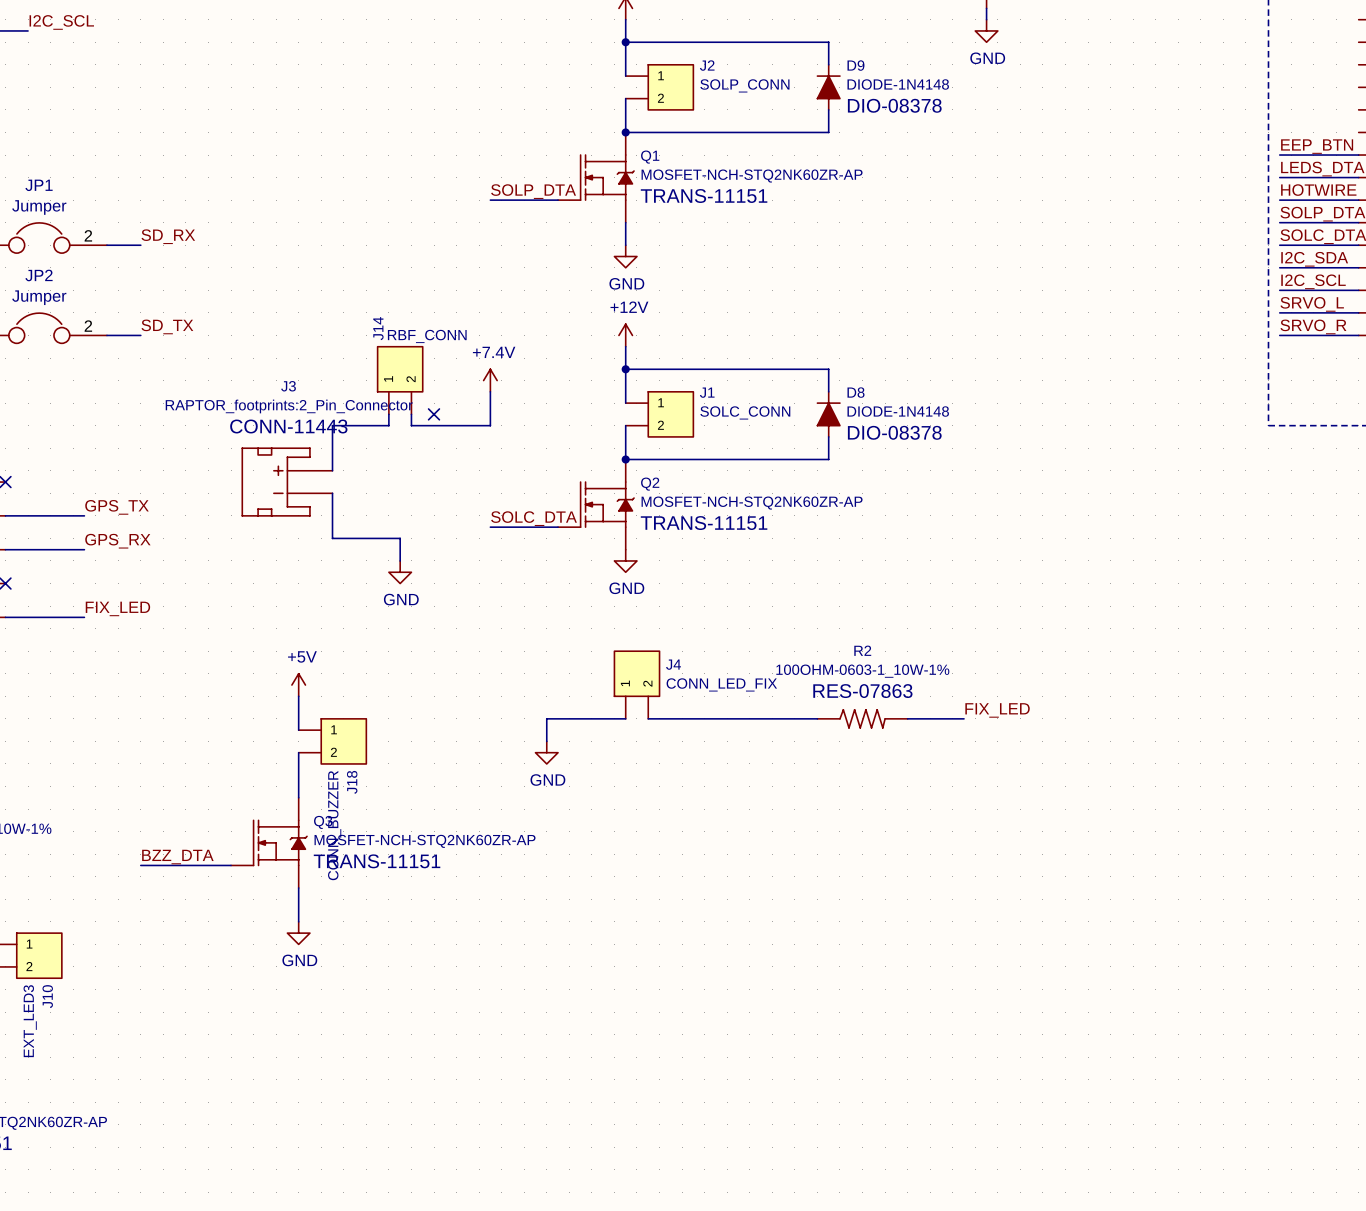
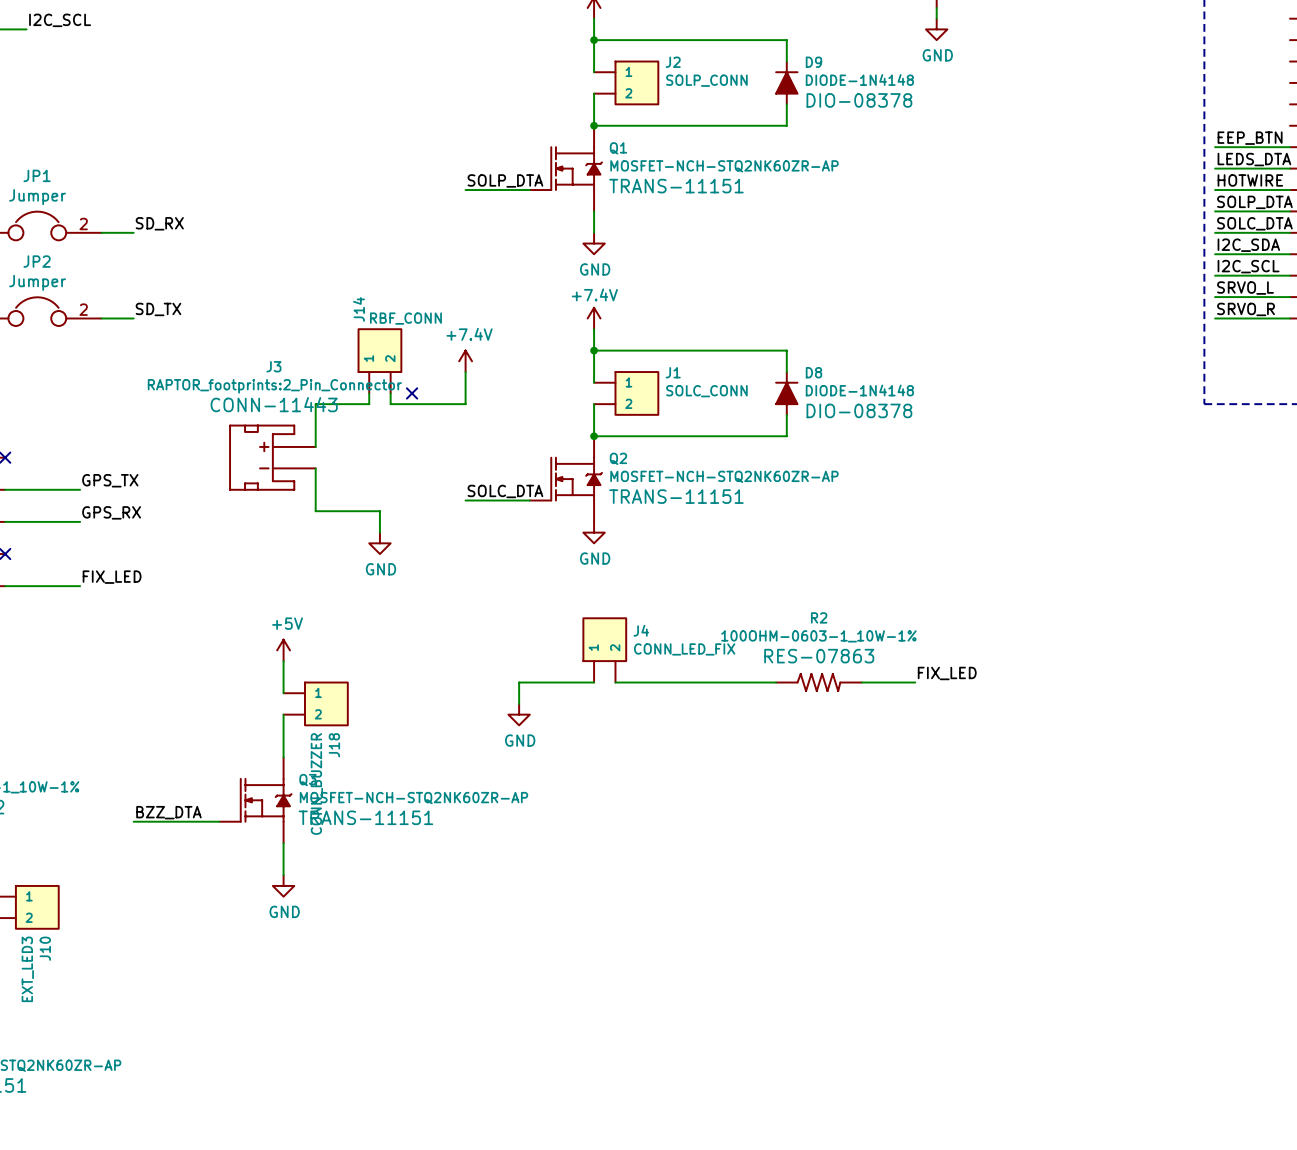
power symbol text: +12V (629, 307) -> none
power symbol text: none -> +7.4V (594, 294)

